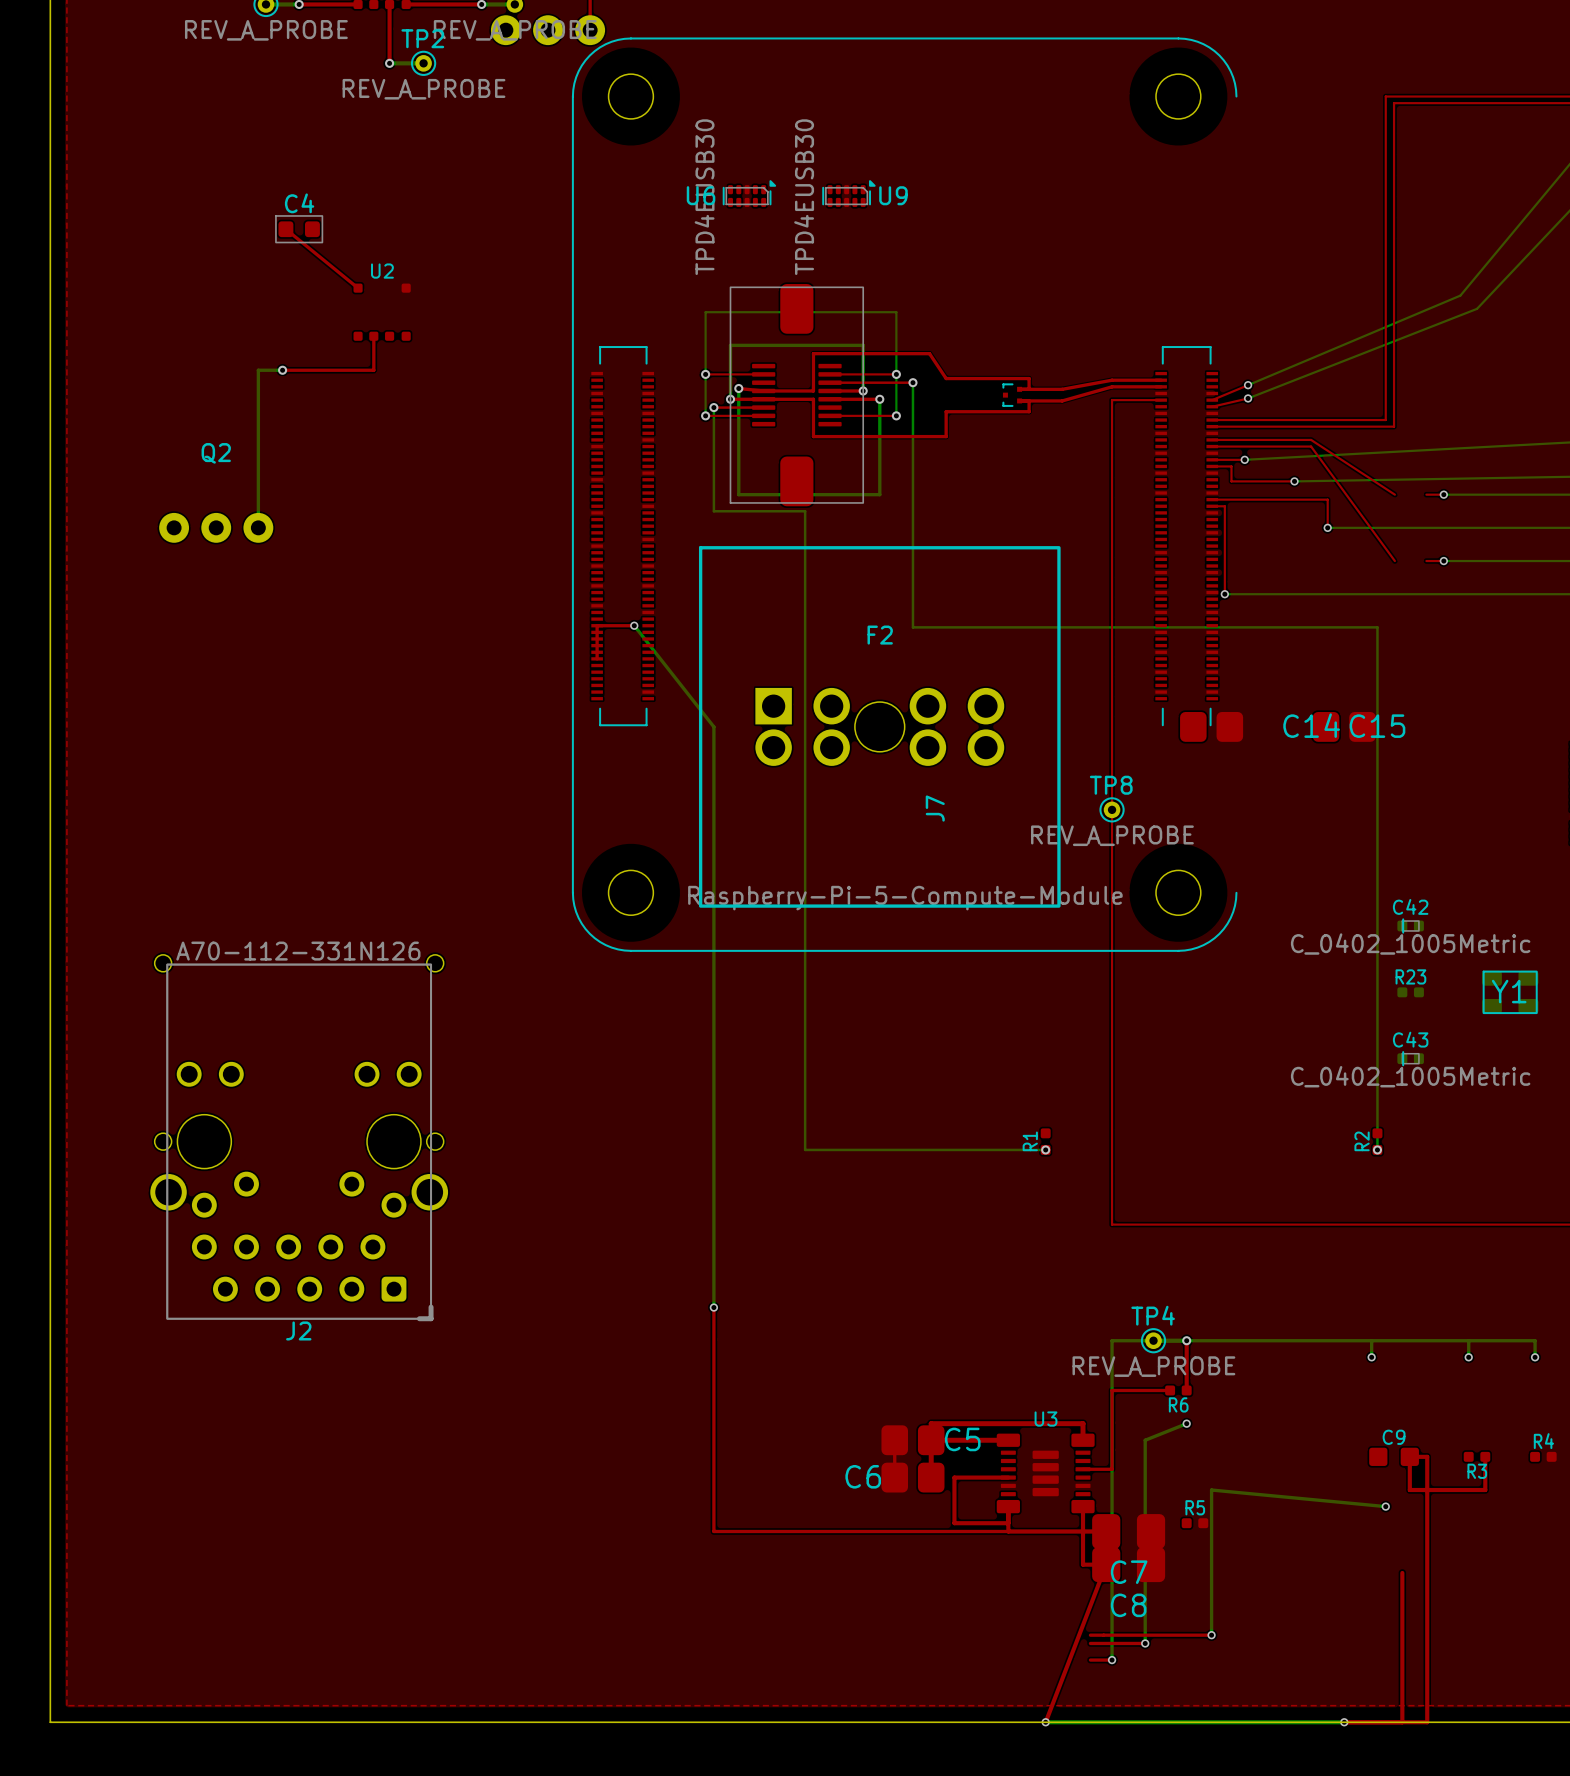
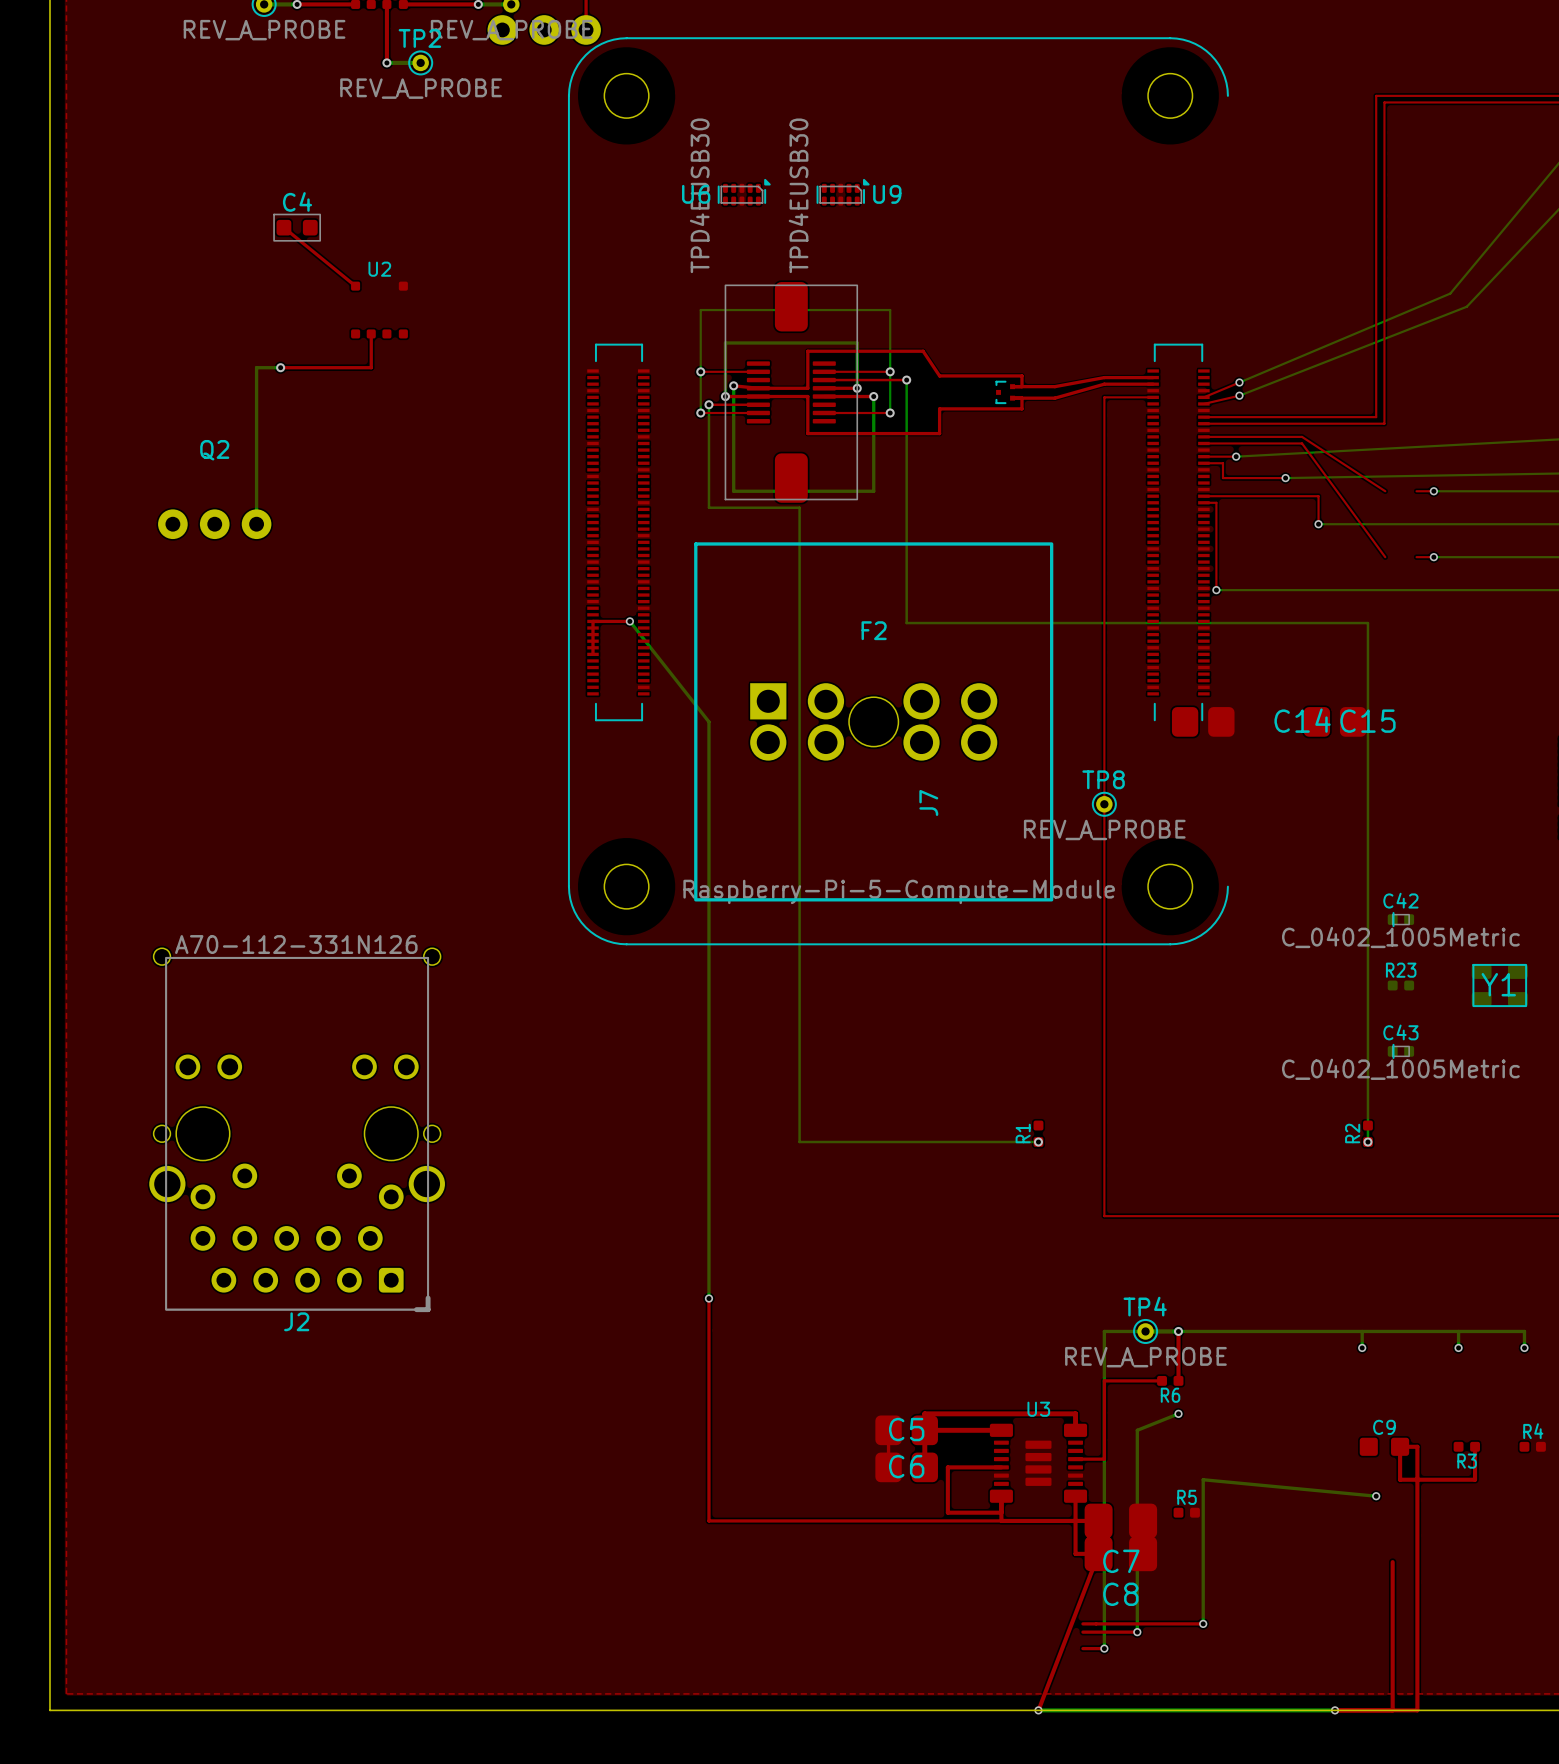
C5 name position: C5 (962, 1439) -> C5 (906, 1429)
C6 name position: C6 (863, 1476) -> C6 (906, 1466)

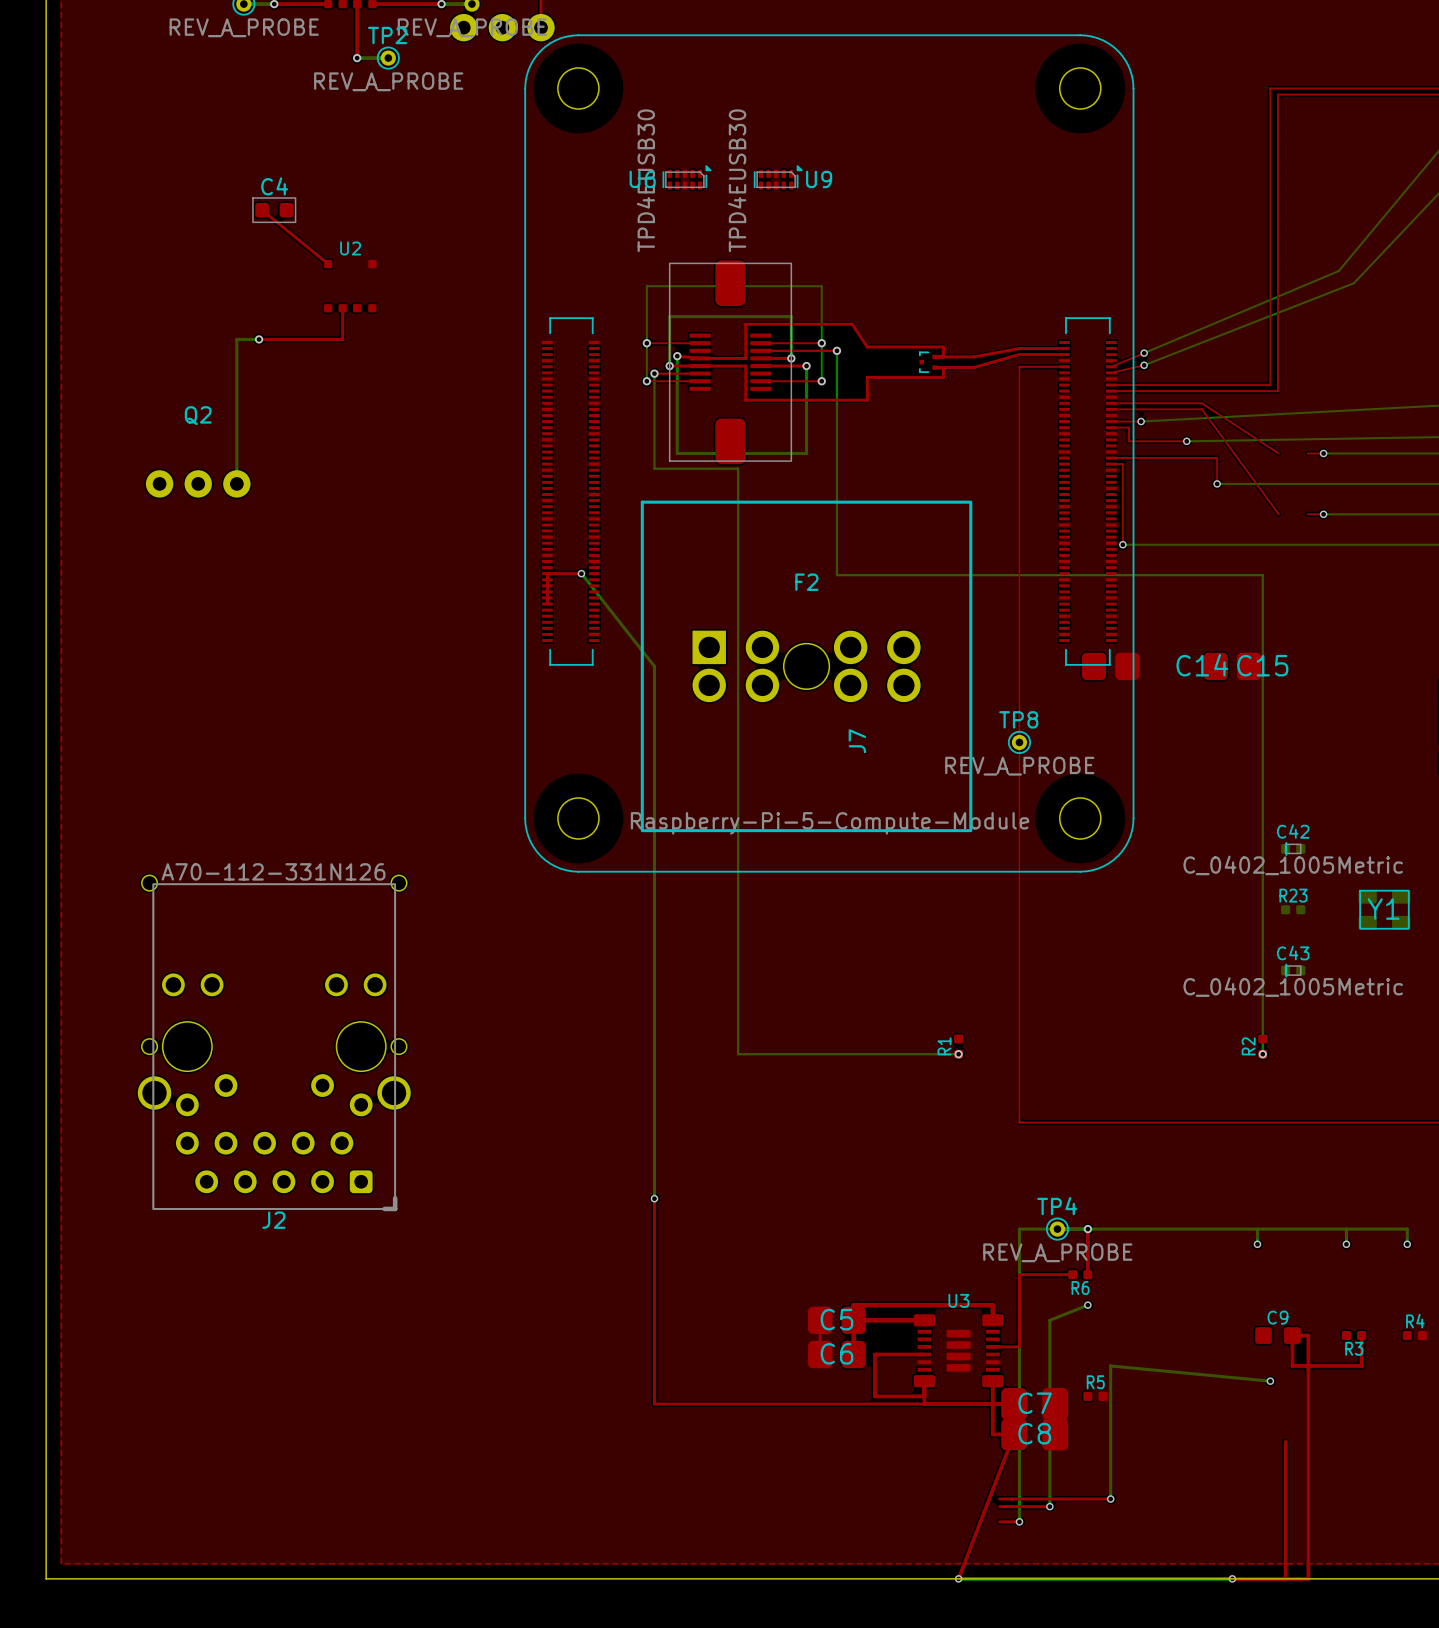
J7 footprint: [567, 37, 1229, 946] -> [524, 34, 1135, 873]
C7 name position: C7 (1121, 1561) -> C7 (1035, 1403)
C8 name position: C8 (1120, 1594) -> C8 (1034, 1433)

